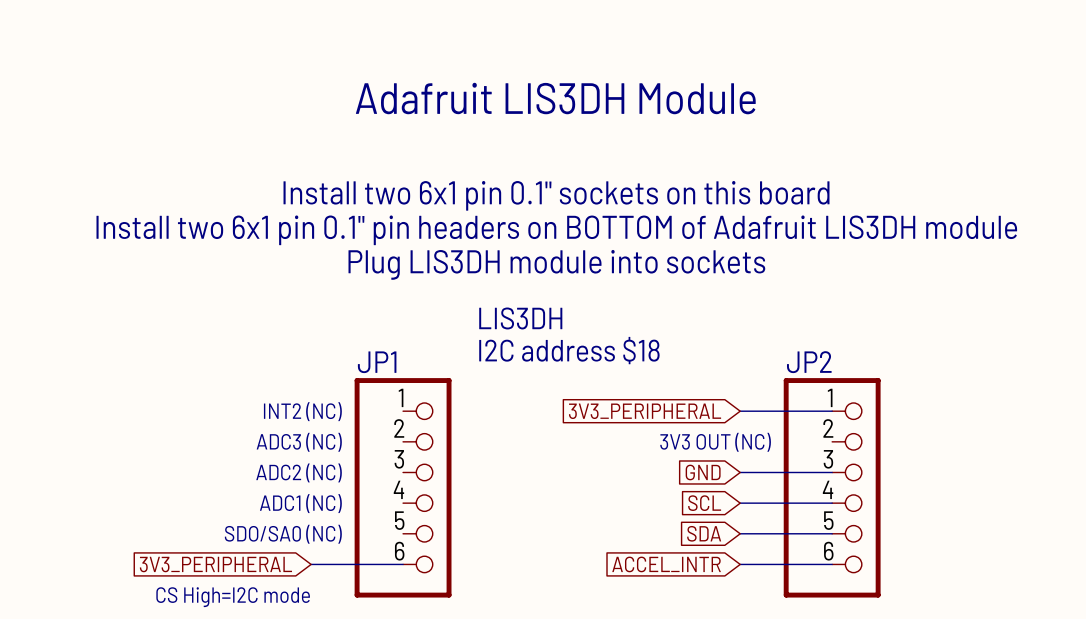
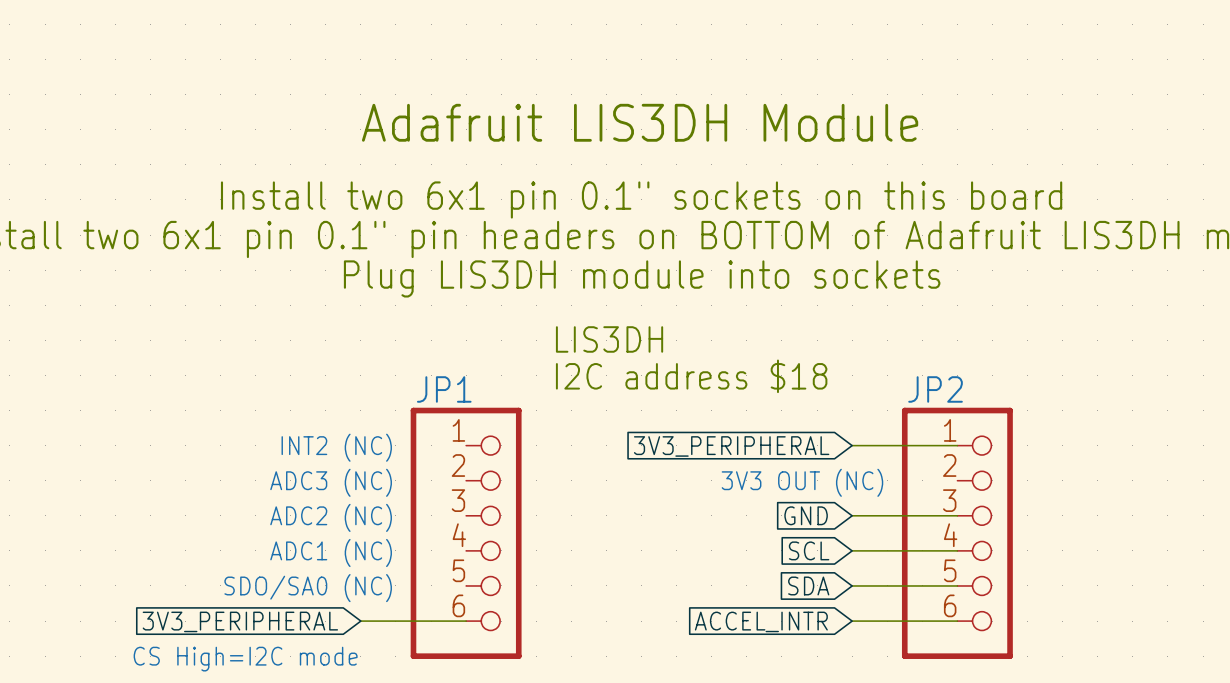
text position: Adafruit LIS3DH Module (555, 98) -> Adafruit LIS3DH Module (640, 122)

